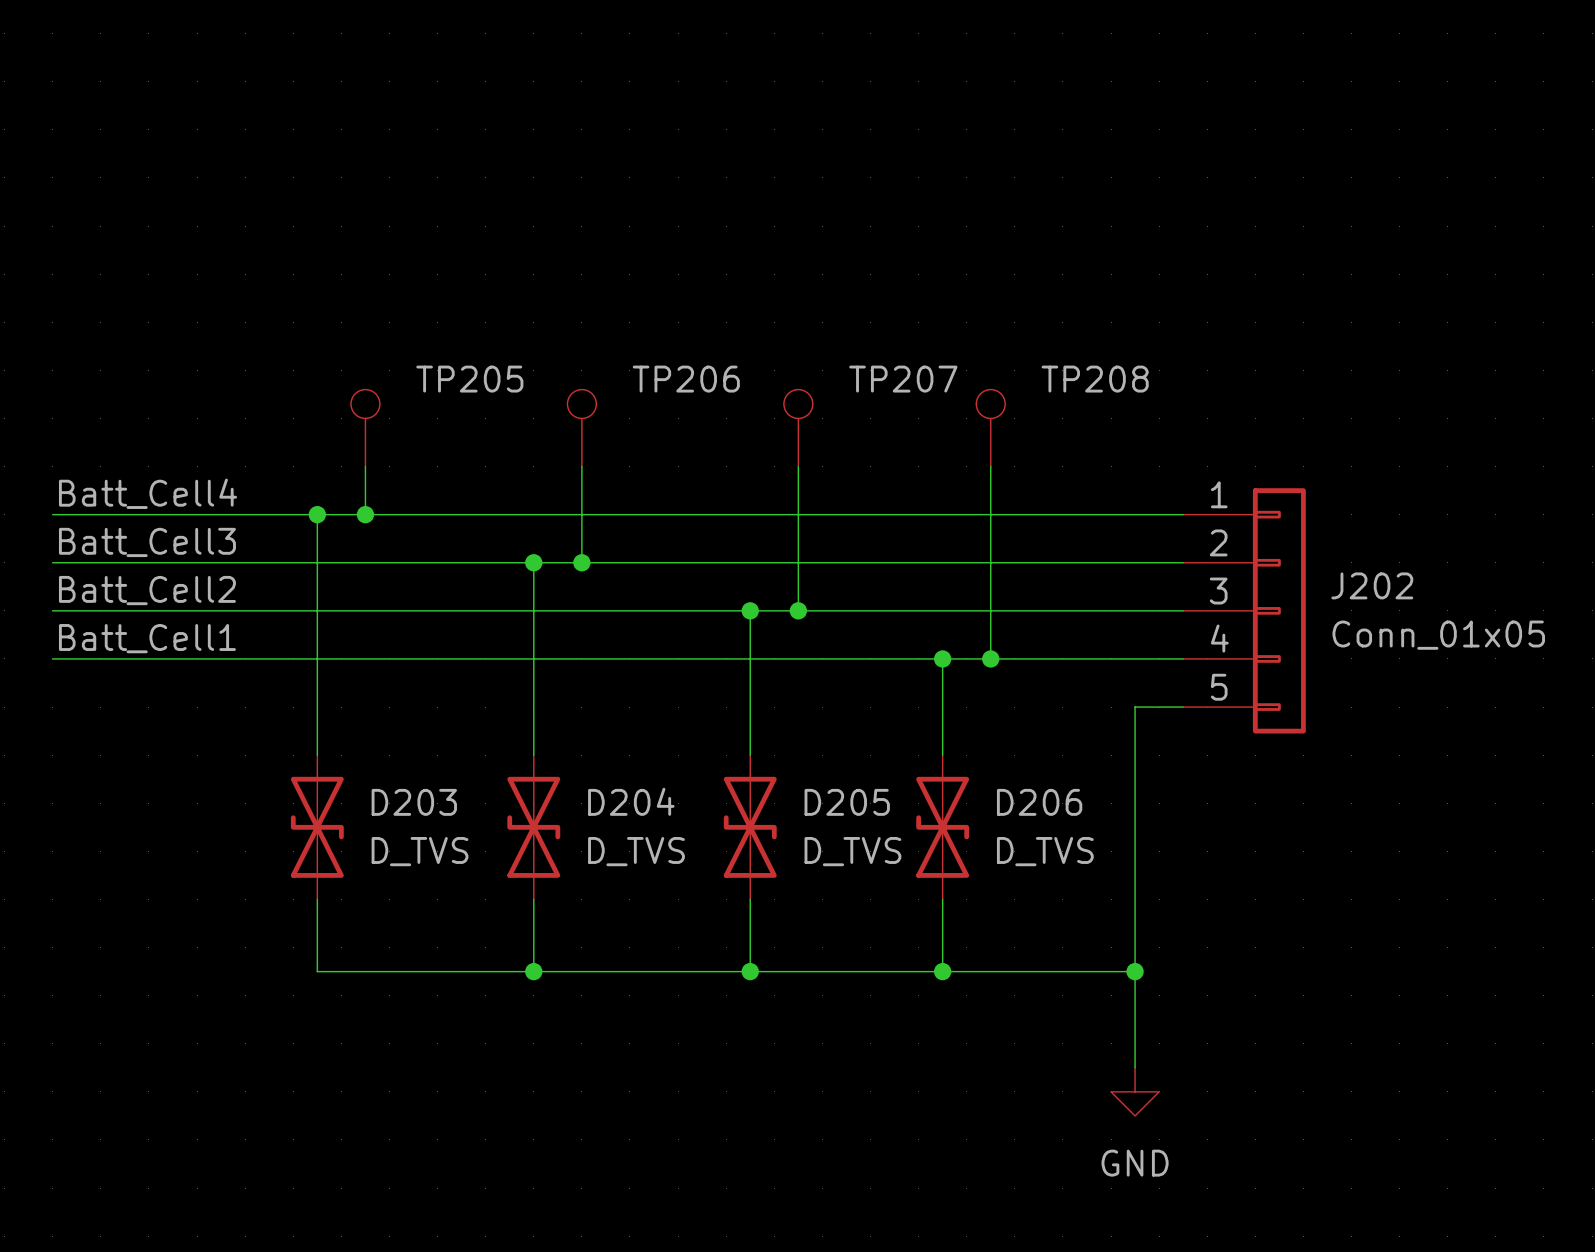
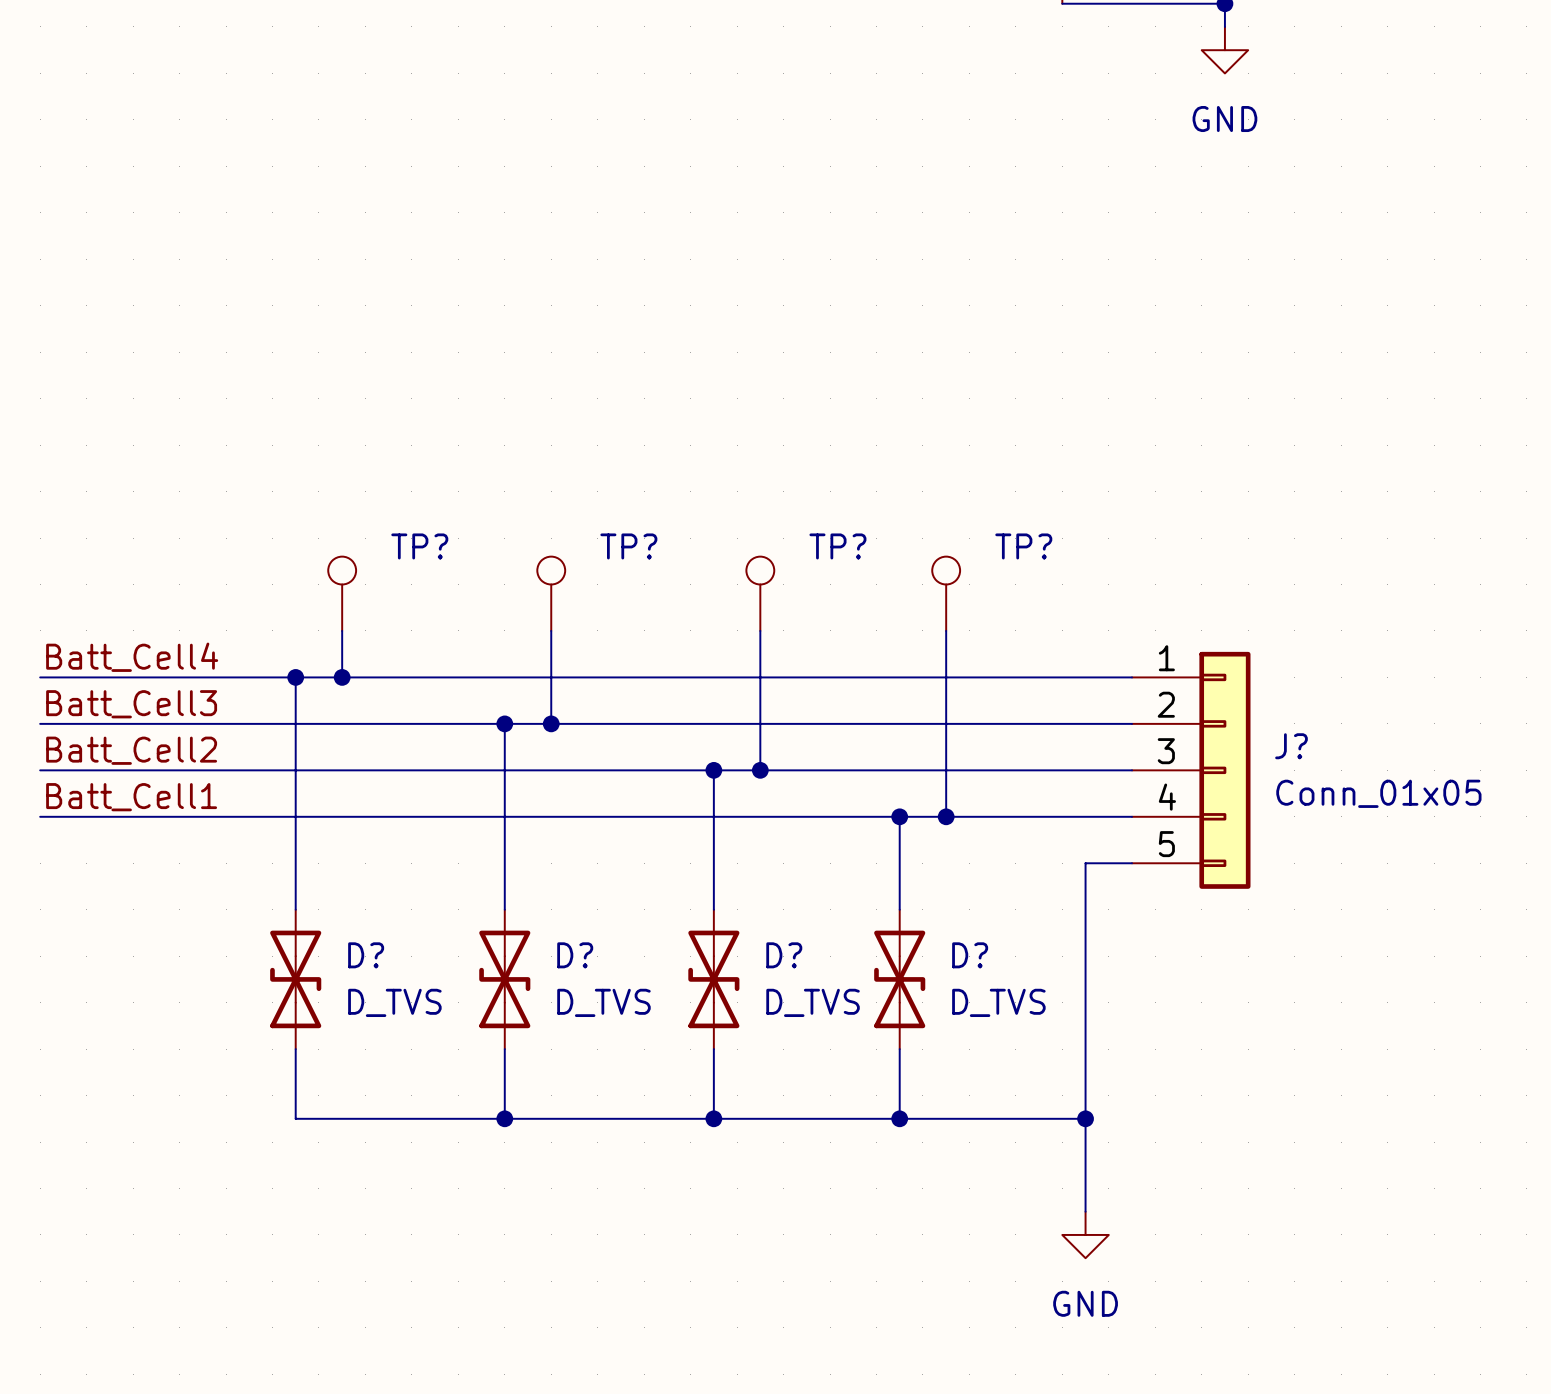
TP205 name: TP205 (469, 379) -> TP? (419, 546)
TP206 name: TP206 (686, 379) -> TP? (628, 546)
TP207 name: TP207 (903, 379) -> TP? (837, 546)
TP208 name: TP208 (1095, 379) -> TP? (1023, 546)
J202 name: J202 (1372, 585) -> J? (1291, 746)
D204 name: D204 (631, 801) -> D? (575, 955)
D203 name: D203 (414, 802) -> D? (366, 955)
D205 name: D205 (847, 802) -> D? (784, 955)
D206 name: D206 (1039, 802) -> D? (970, 955)

